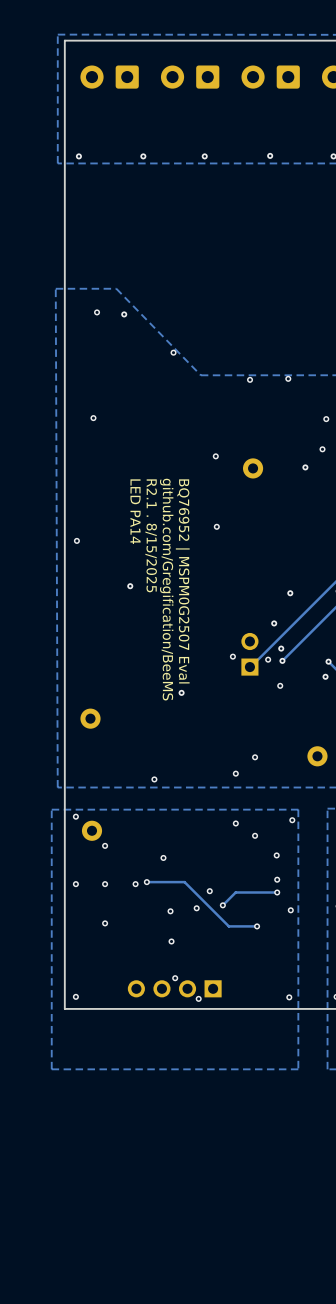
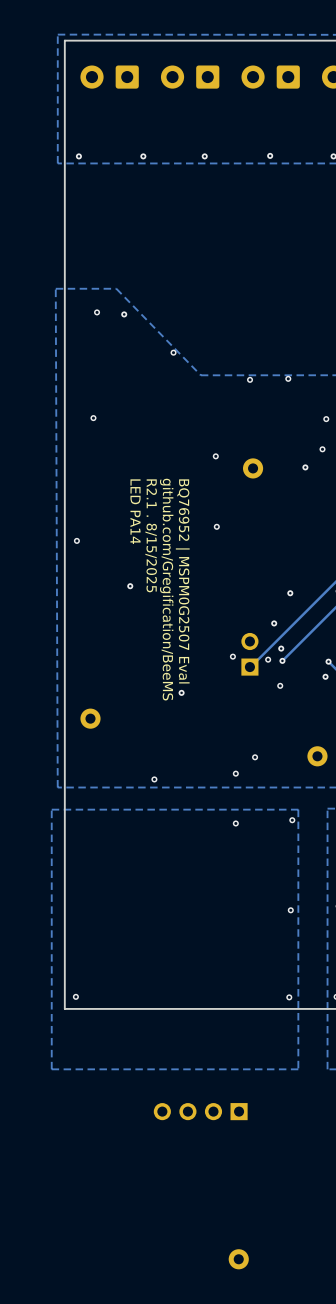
via: (75, 816) -> none
part: (92, 830) -> none
via: (255, 835) -> none
via: (105, 845) -> none
via: (276, 855) -> none
via: (163, 857) -> none
via: (277, 879) -> none
track: (146, 882) (184, 882) (228, 926) (257, 926) -> none
via: (146, 882) -> none
via: (75, 884) -> none
via: (105, 884) -> none
via: (135, 884) -> none
via: (209, 891) -> none
track: (277, 892) (235, 892) (222, 905) -> none
via: (277, 892) -> none
via: (222, 905) -> none
via: (196, 908) -> none
via: (170, 911) -> none
via: (105, 923) -> none
via: (257, 926) -> none
via: (171, 941) -> none
via: (175, 978) -> none
part position: (174, 988) -> (200, 1111)
via: (198, 998) -> none
part: none -> (238, 1259)

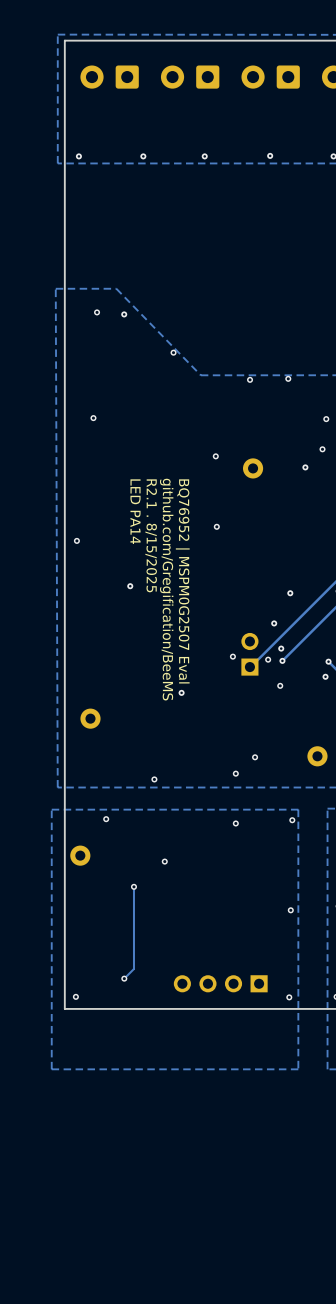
via: none -> (106, 819)
part: none -> (80, 855)
via: none -> (164, 861)
track: none -> (133, 886) (133, 968) (124, 978)
via: none -> (133, 886)
via: none -> (124, 978)
part position: (200, 1111) -> (220, 983)
part: (238, 1259) -> none

